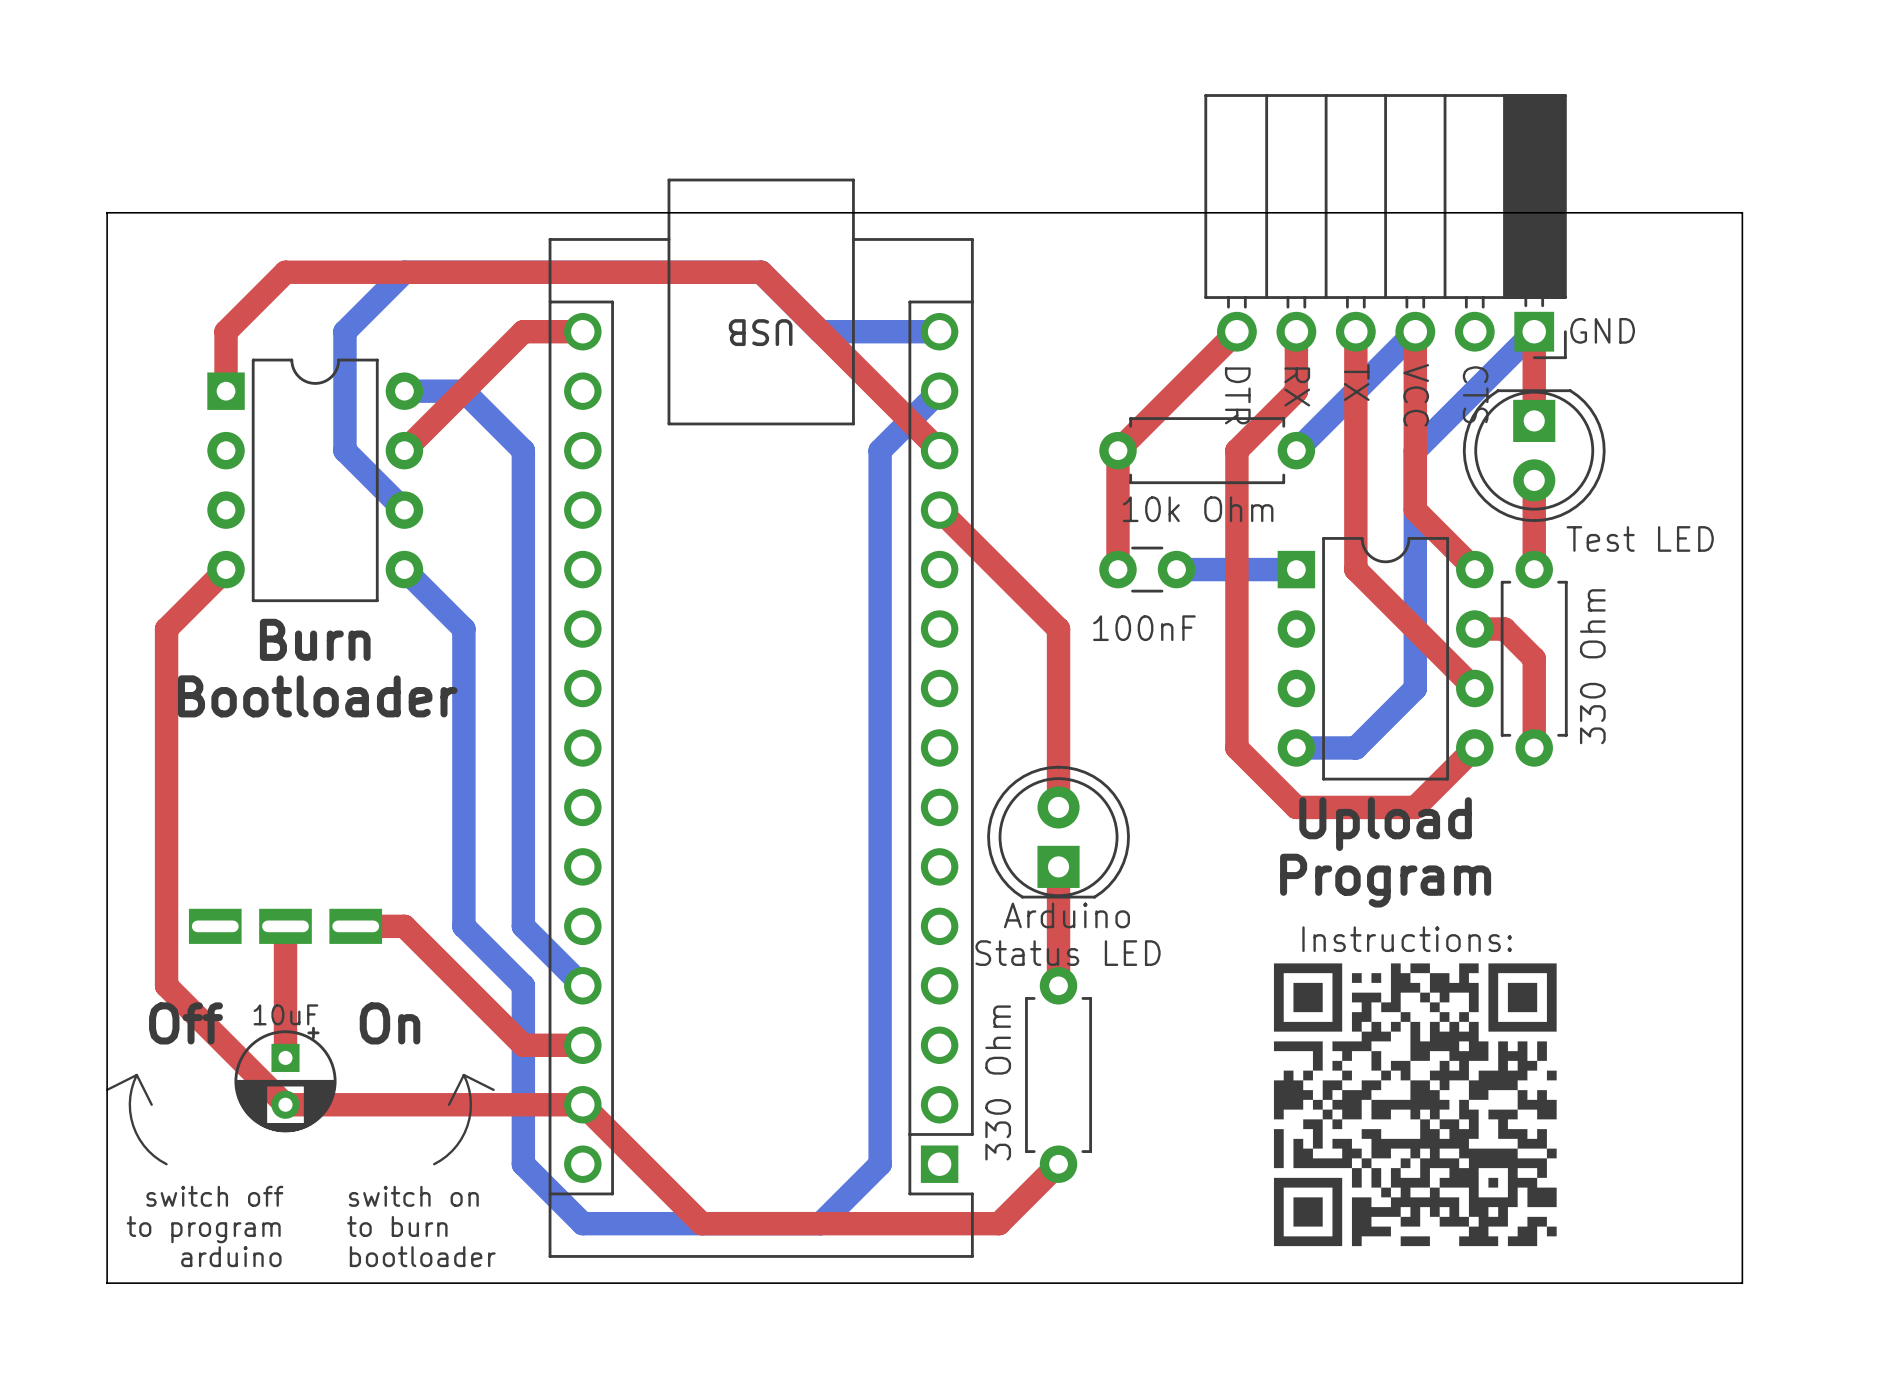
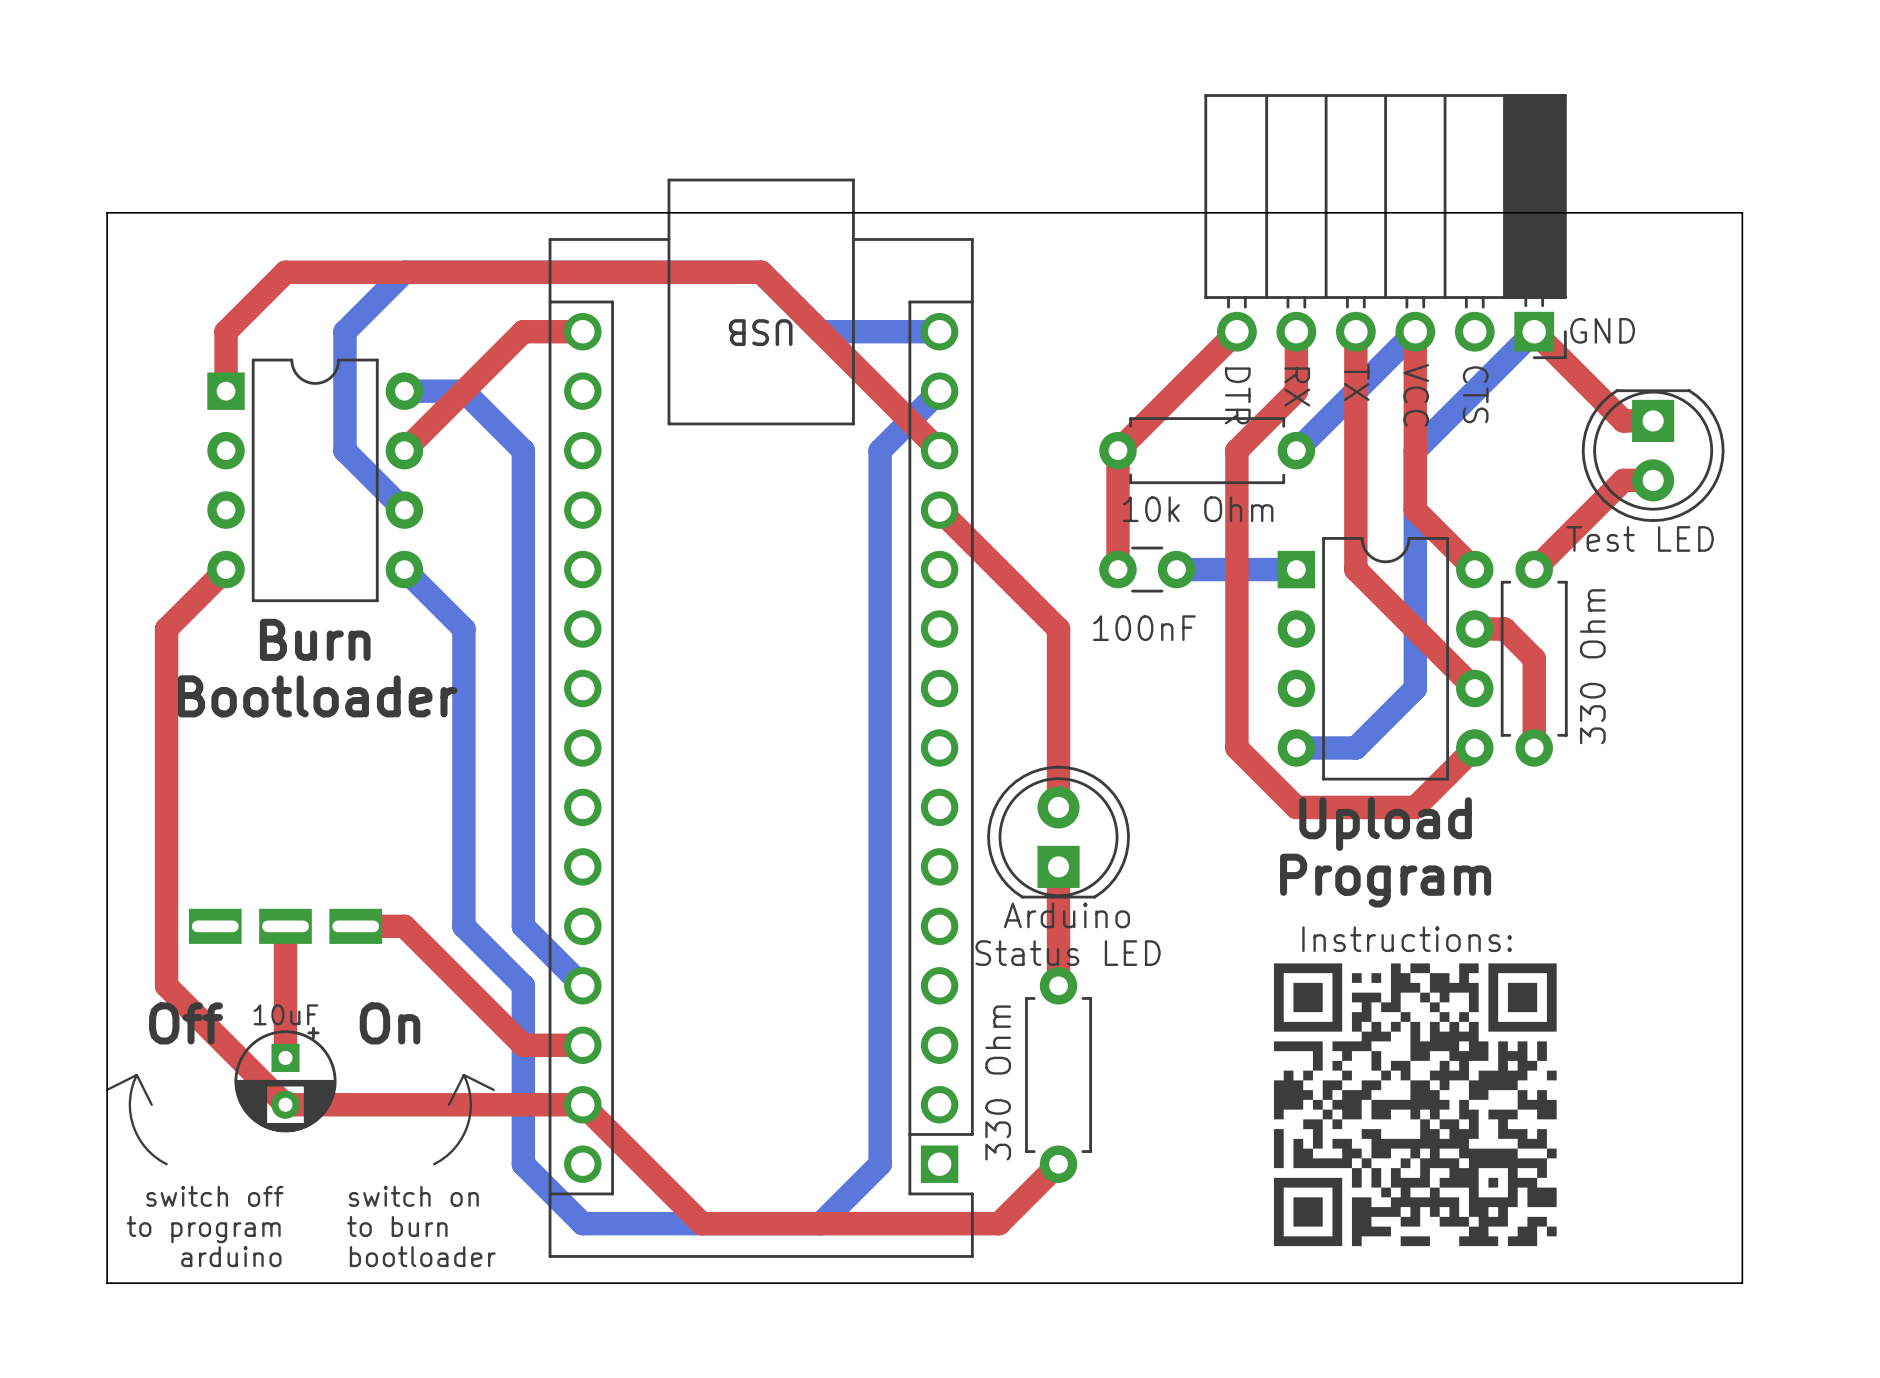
top track: (1534, 331) (1534, 420) -> (1534, 331) (1623, 420) (1653, 420)
part position: (1534, 455) -> (1653, 455)
top track: (1534, 480) (1534, 569) -> (1653, 480) (1623, 480) (1534, 569)

